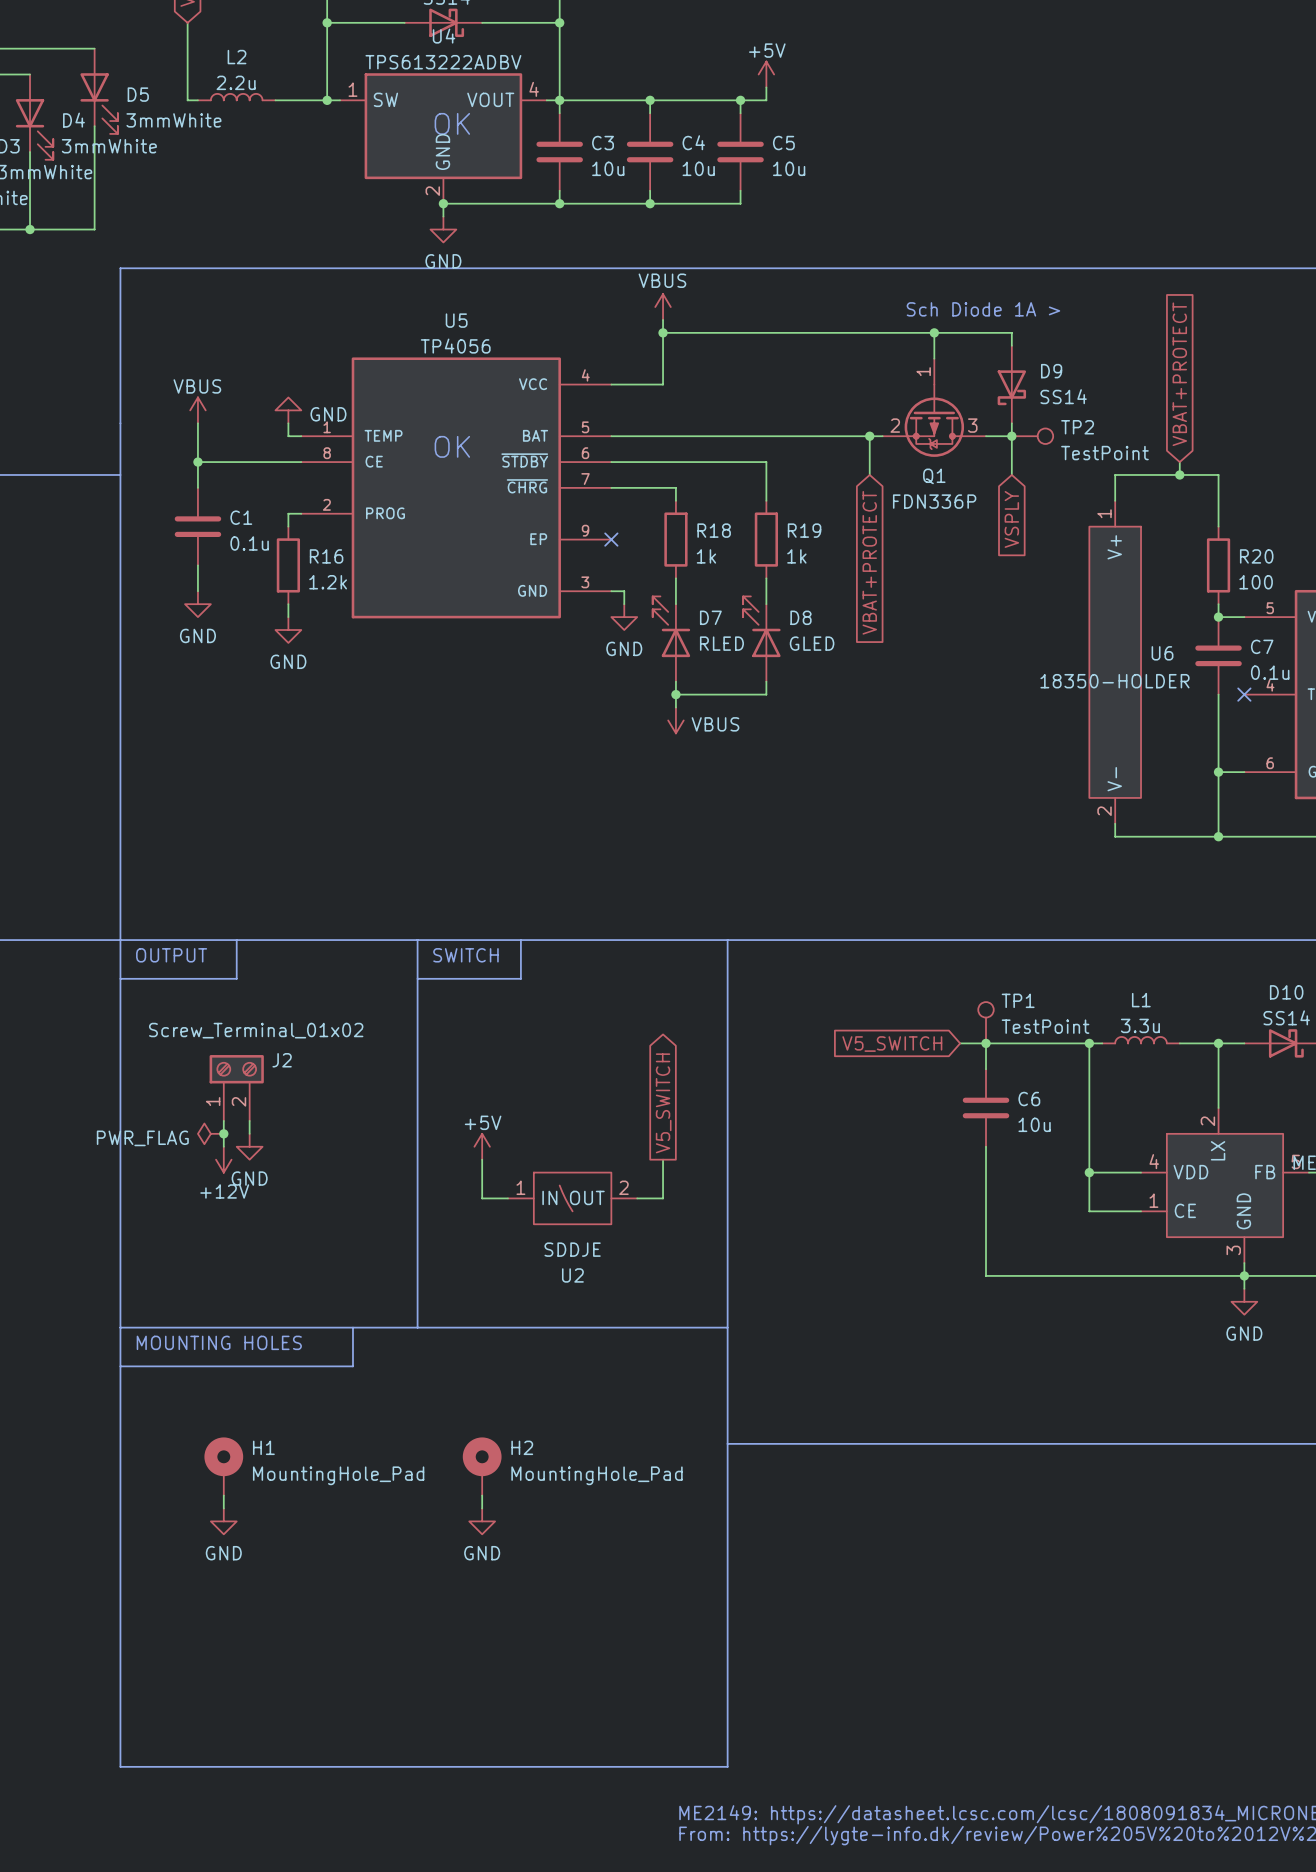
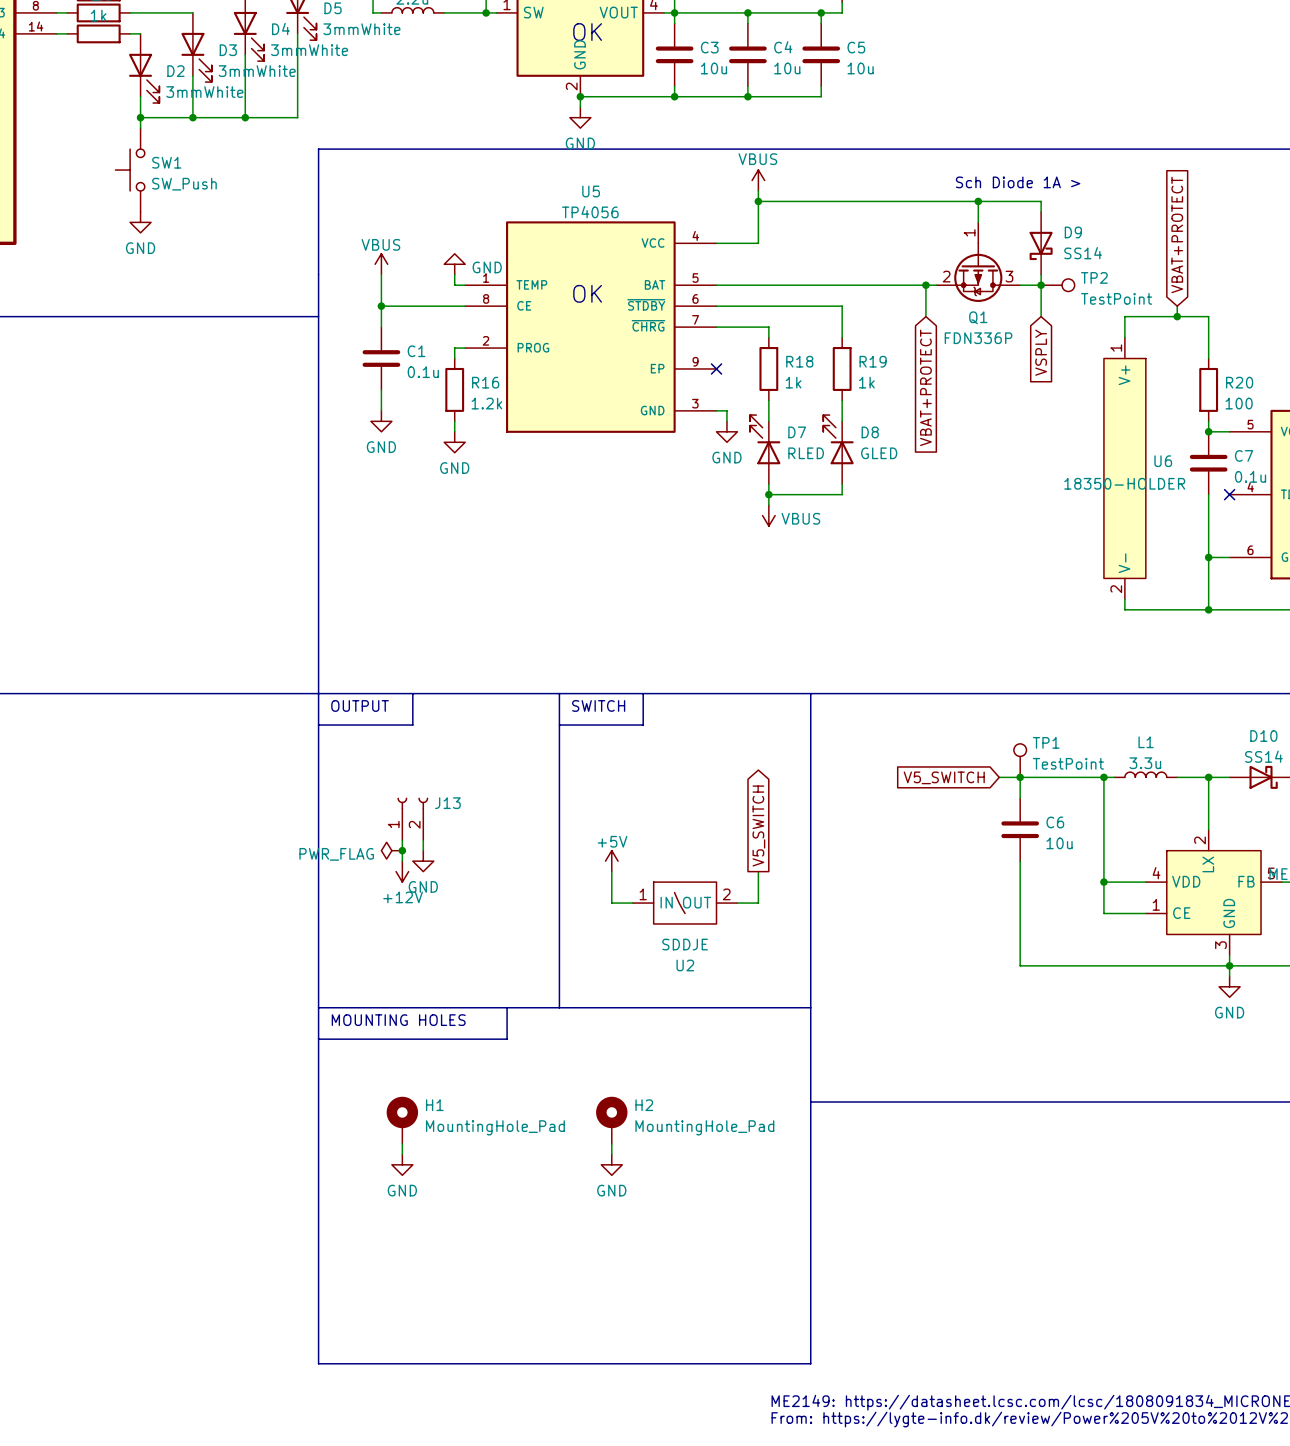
J2: Screw_Terminal_01x02 (236, 1087) -> none
J13: none -> (412, 818)

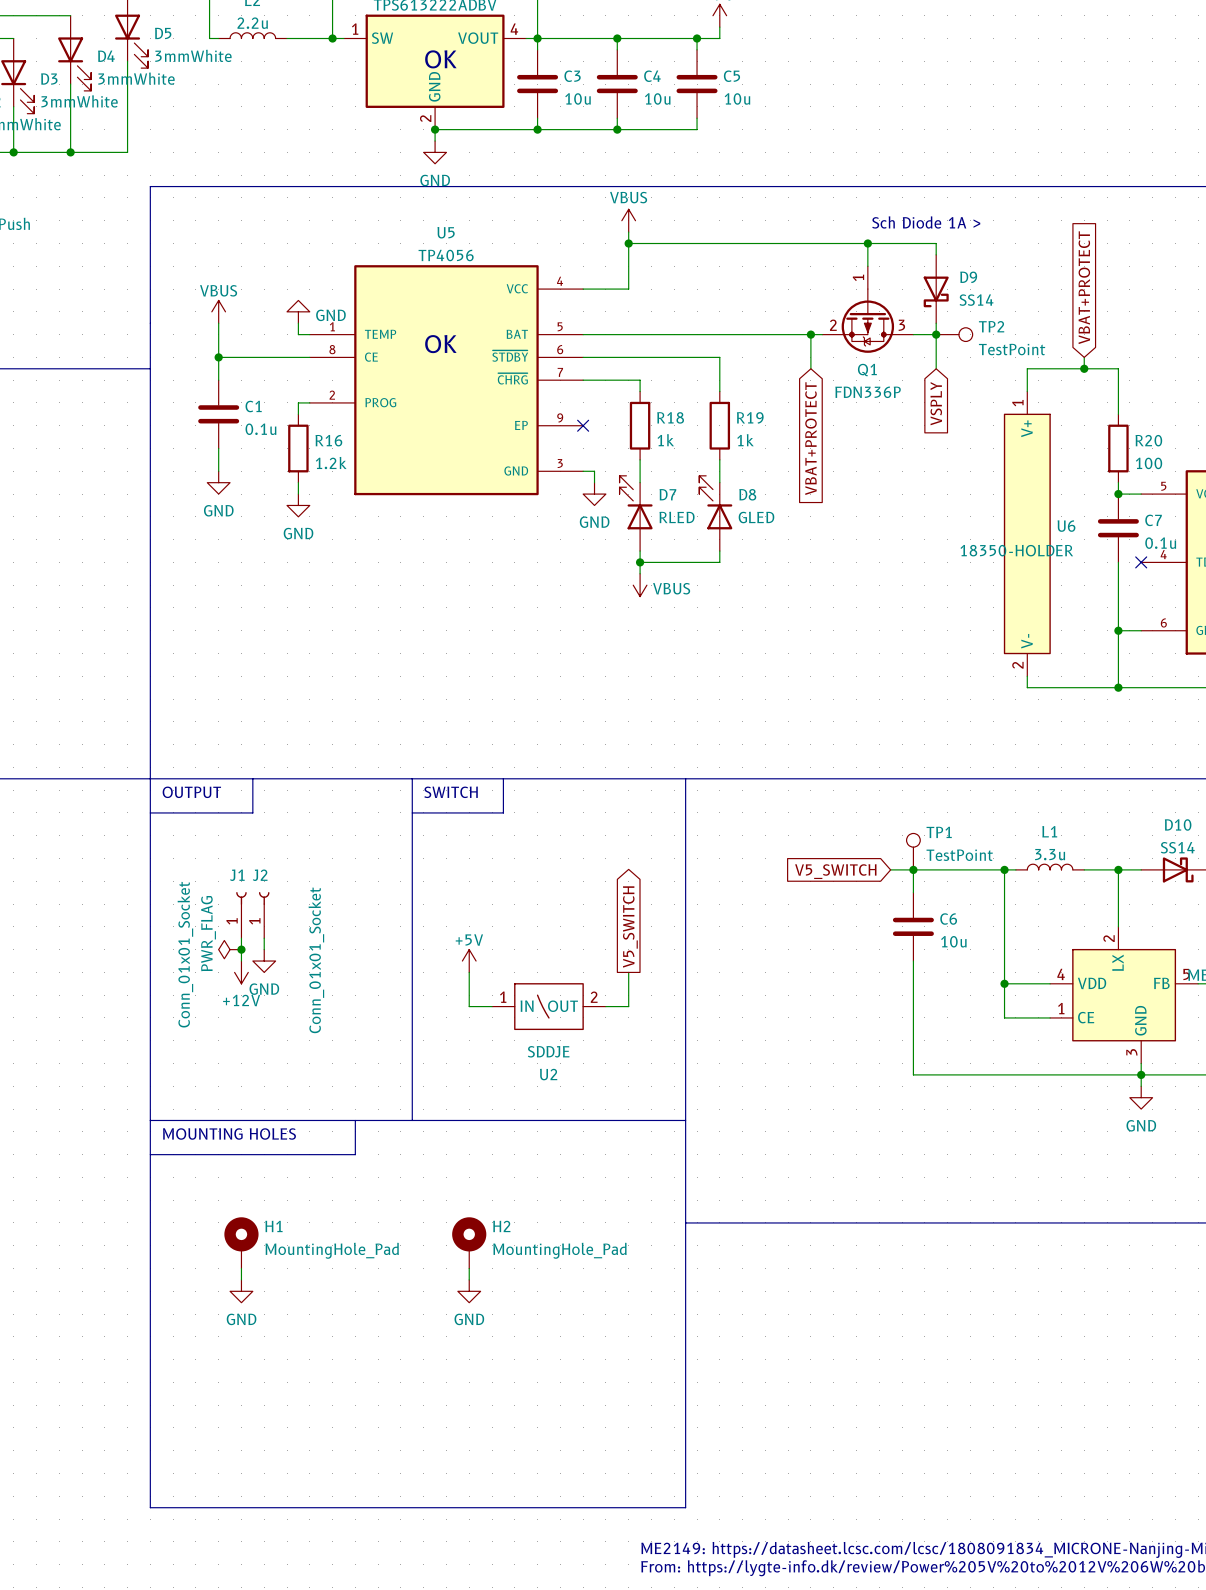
J1: none -> Conn_01x01_Socket (241, 915)
J13: (412, 818) -> none
J2: none -> Conn_01x01_Socket (264, 915)
power symbol text rotation: 0° (336, 854) -> 90° counterclockwise (208, 933)

